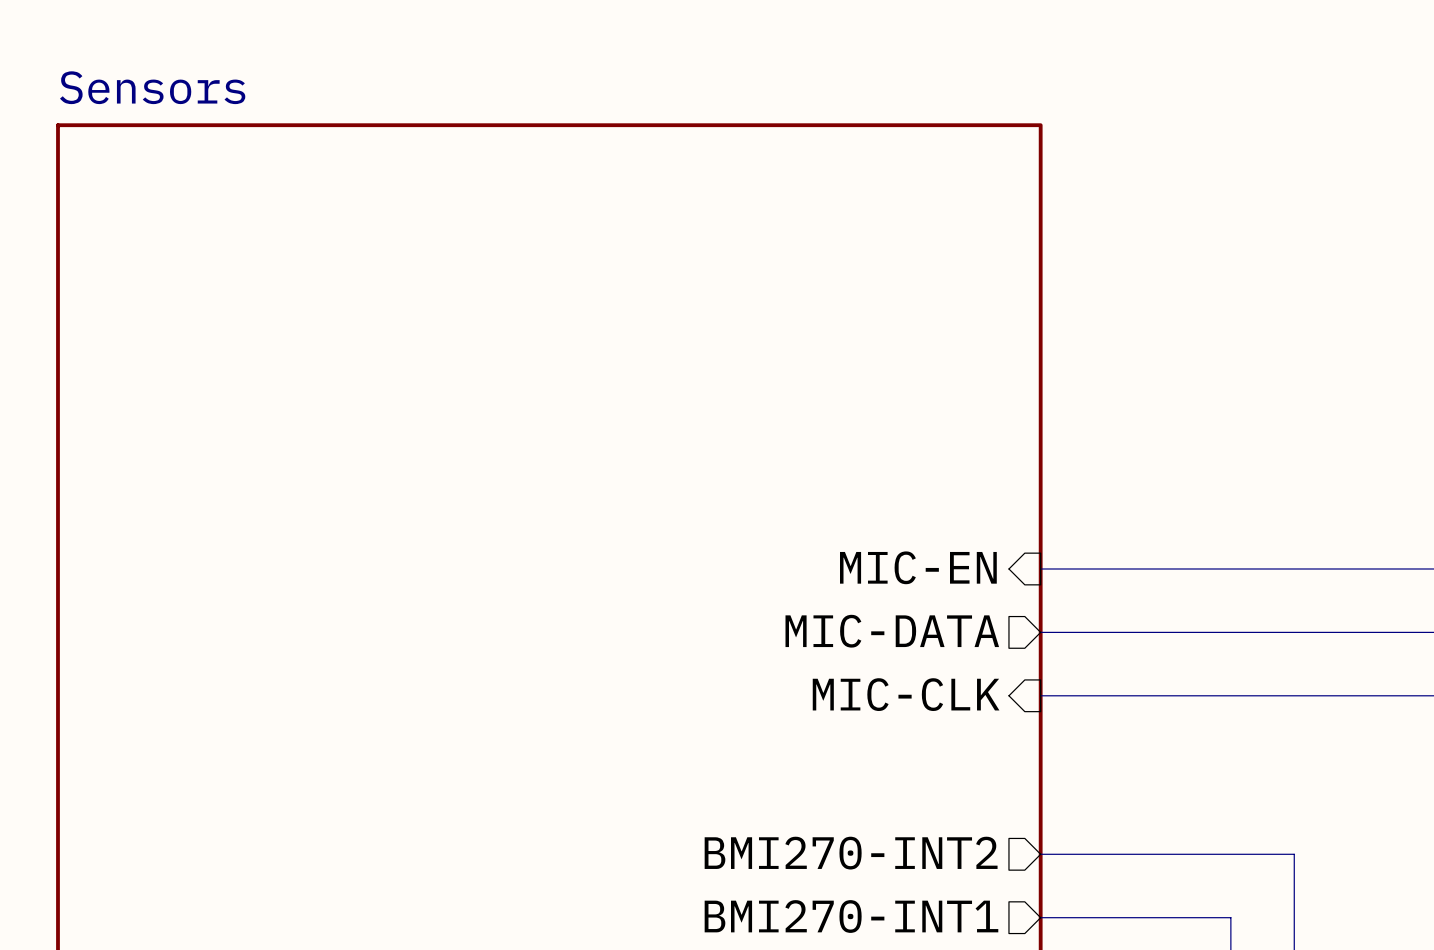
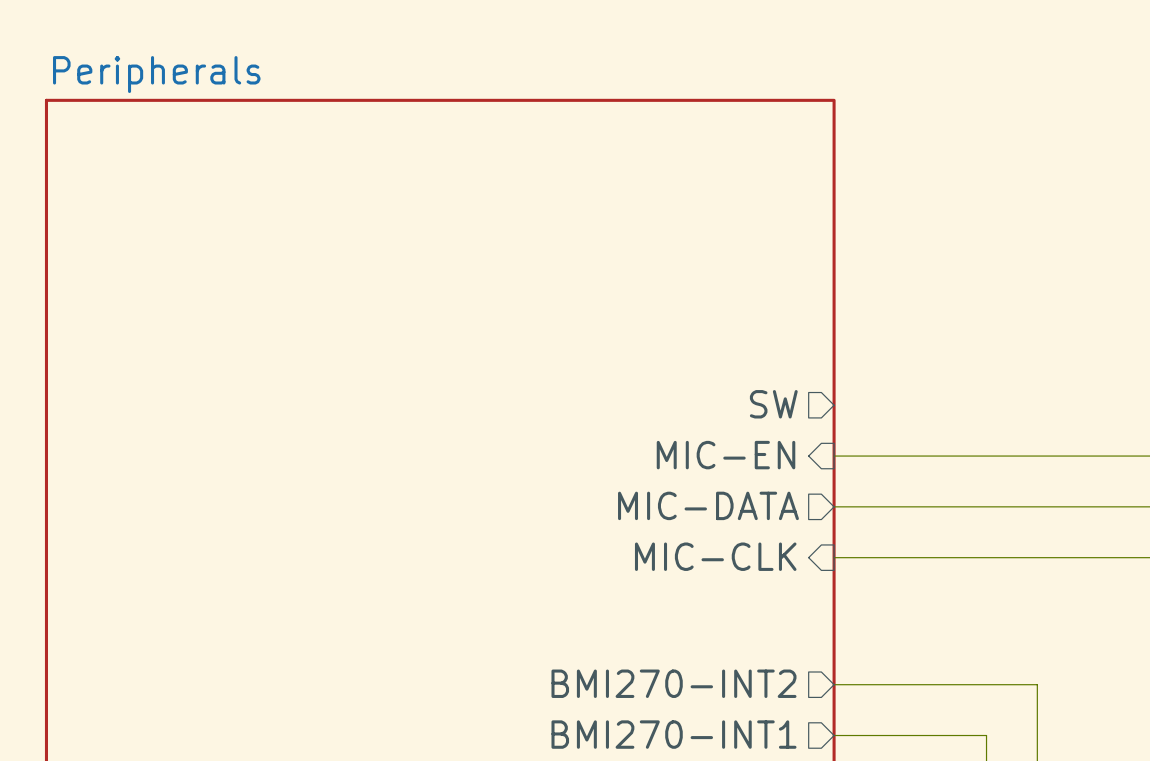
sheet Sensors name: Sensors (152, 87) -> Peripherals (156, 74)
sheet pin: none -> SW (773, 404)

